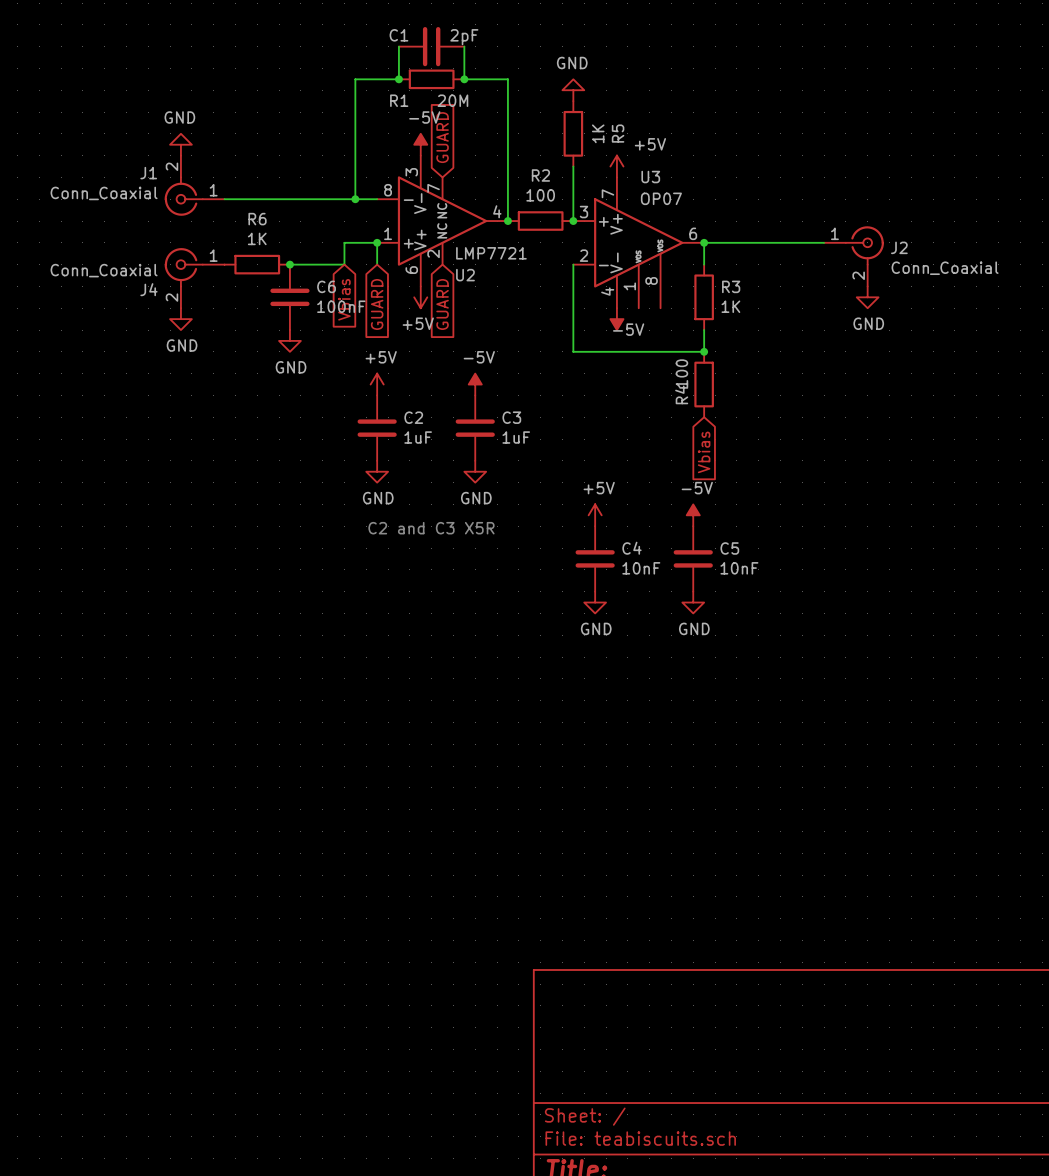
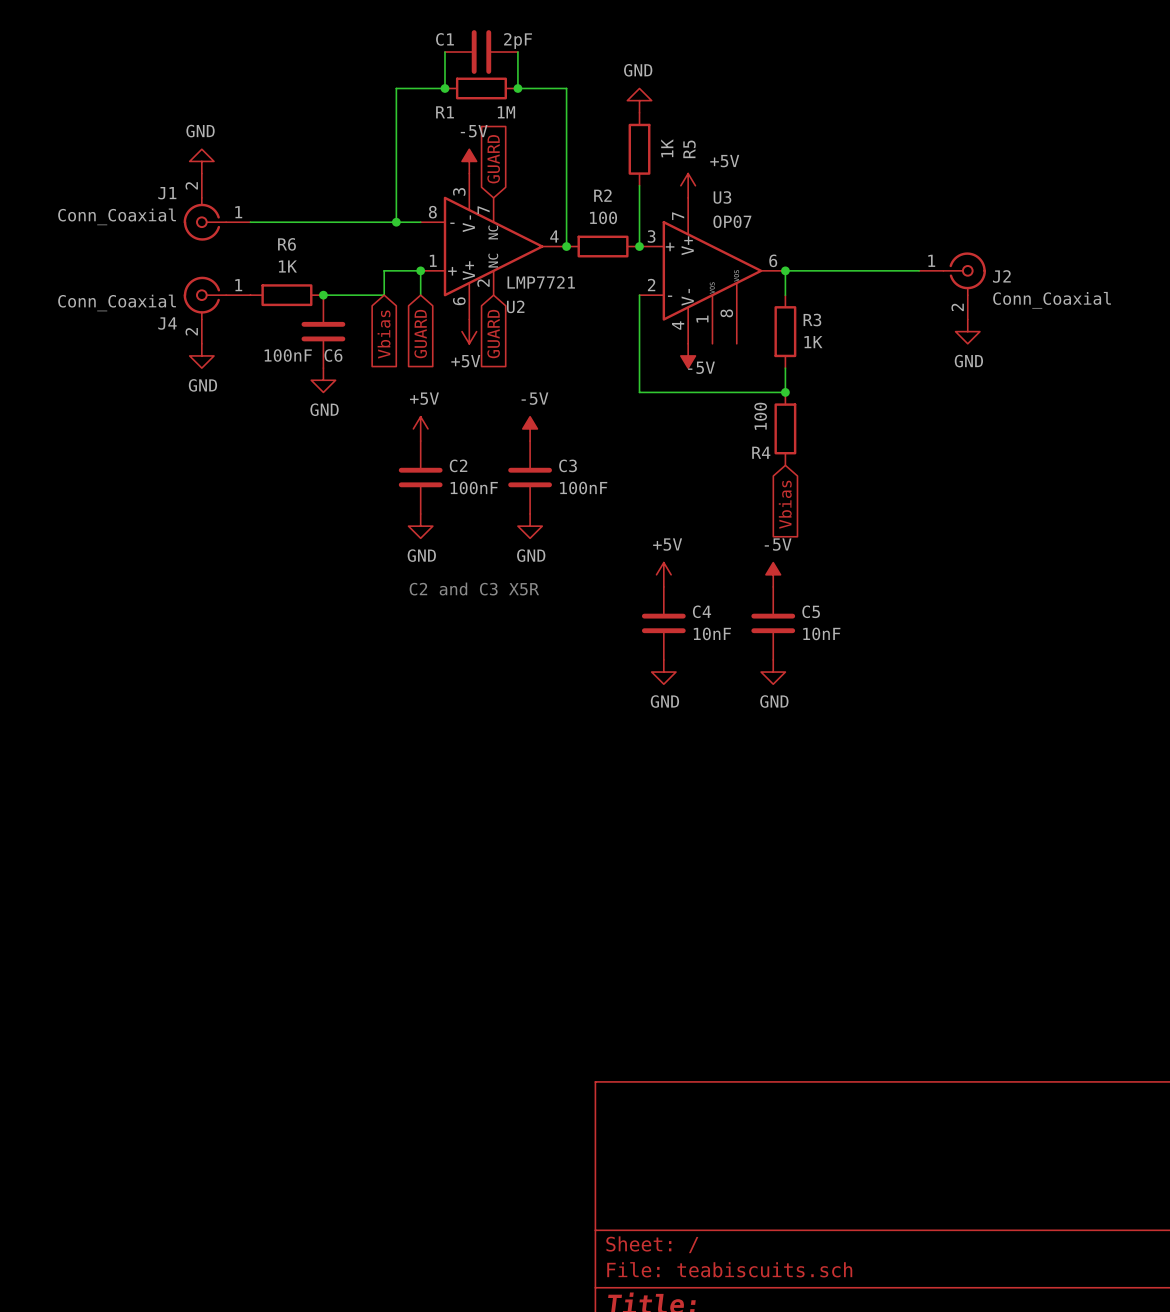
R1 value: 20M (452, 100) -> 1M (506, 112)
C6 name position: C6 (326, 286) -> C6 (333, 355)
C6 value position: 100nF (341, 306) -> 100nF (288, 355)
R4 name rotation: 0° (681, 394) -> 90° clockwise (761, 452)
C2 value: 1uF (418, 437) -> 100nF (474, 488)
C3 value: 1uF (516, 437) -> 100nF (583, 488)

